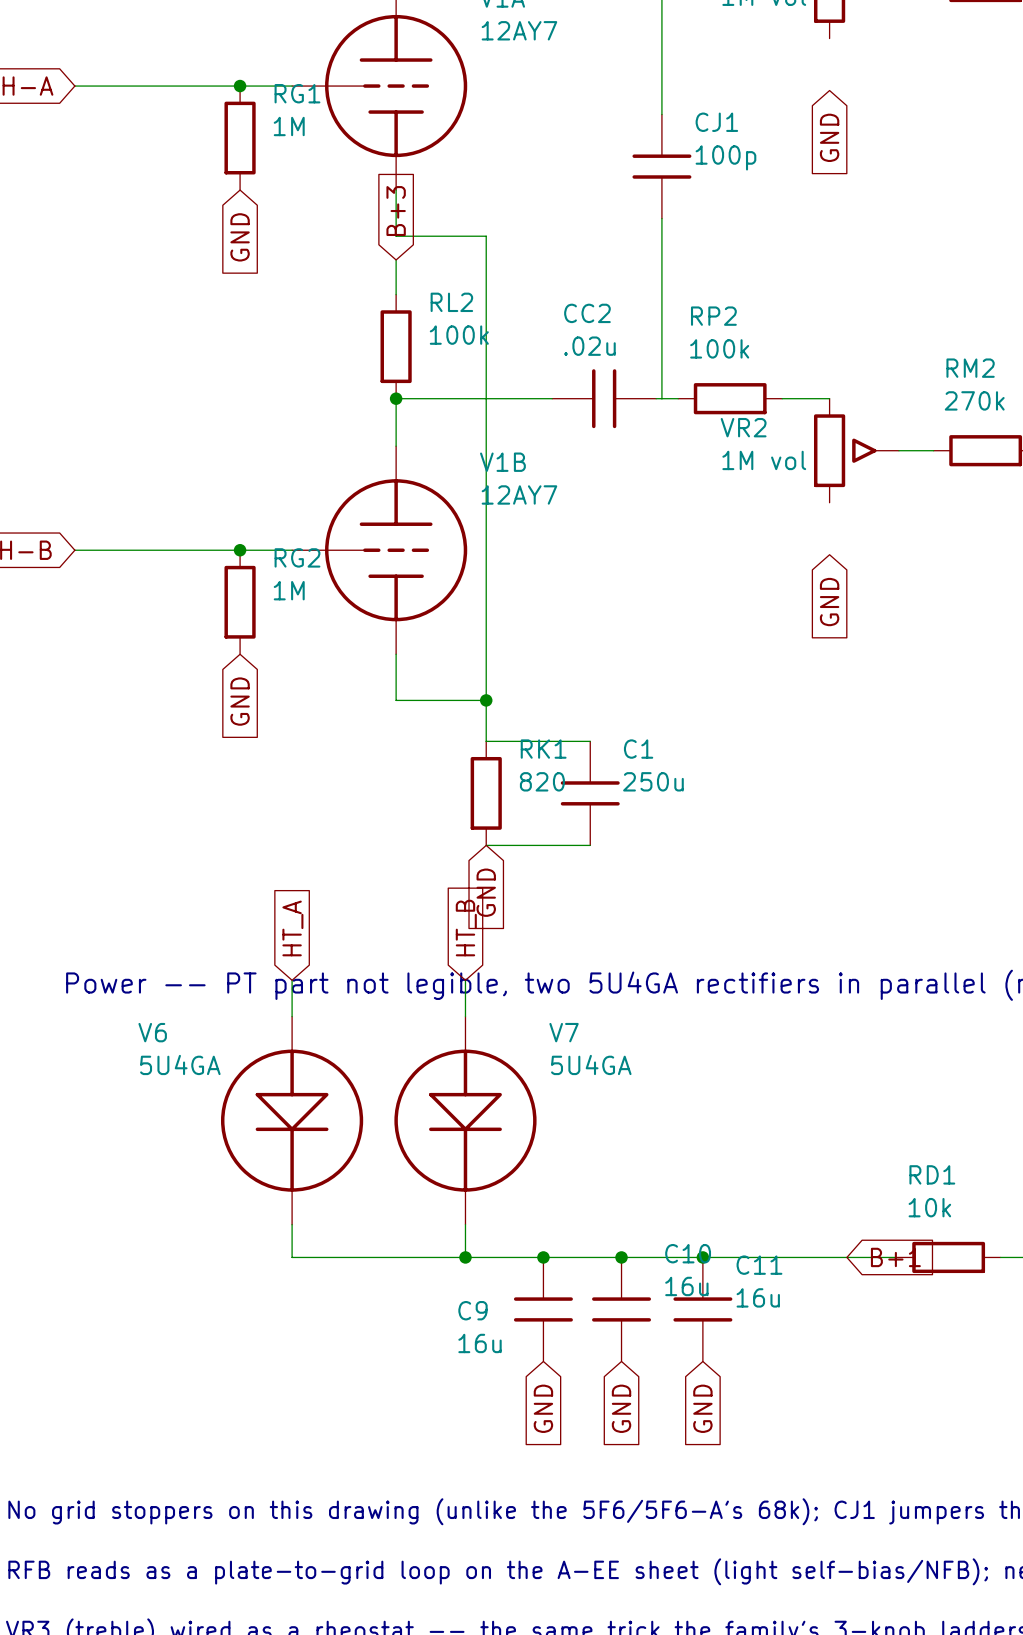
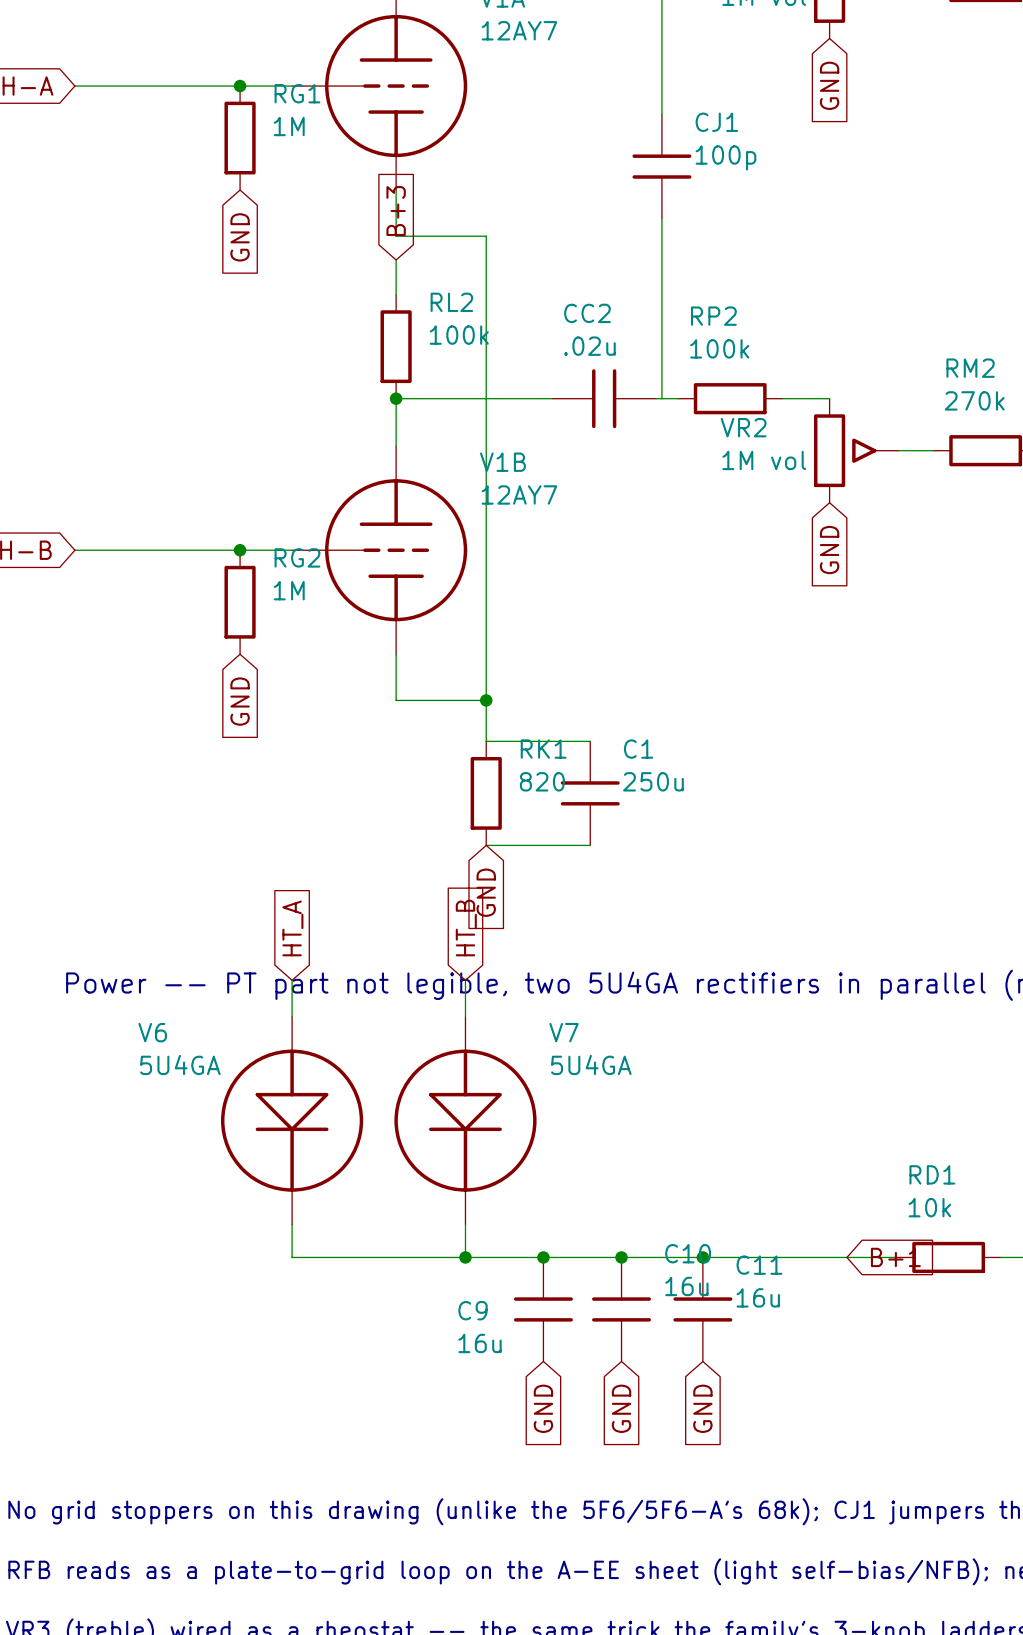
global label position: GND (829, 137) -> GND (829, 85)
global label position: GND (829, 602) -> GND (829, 550)

